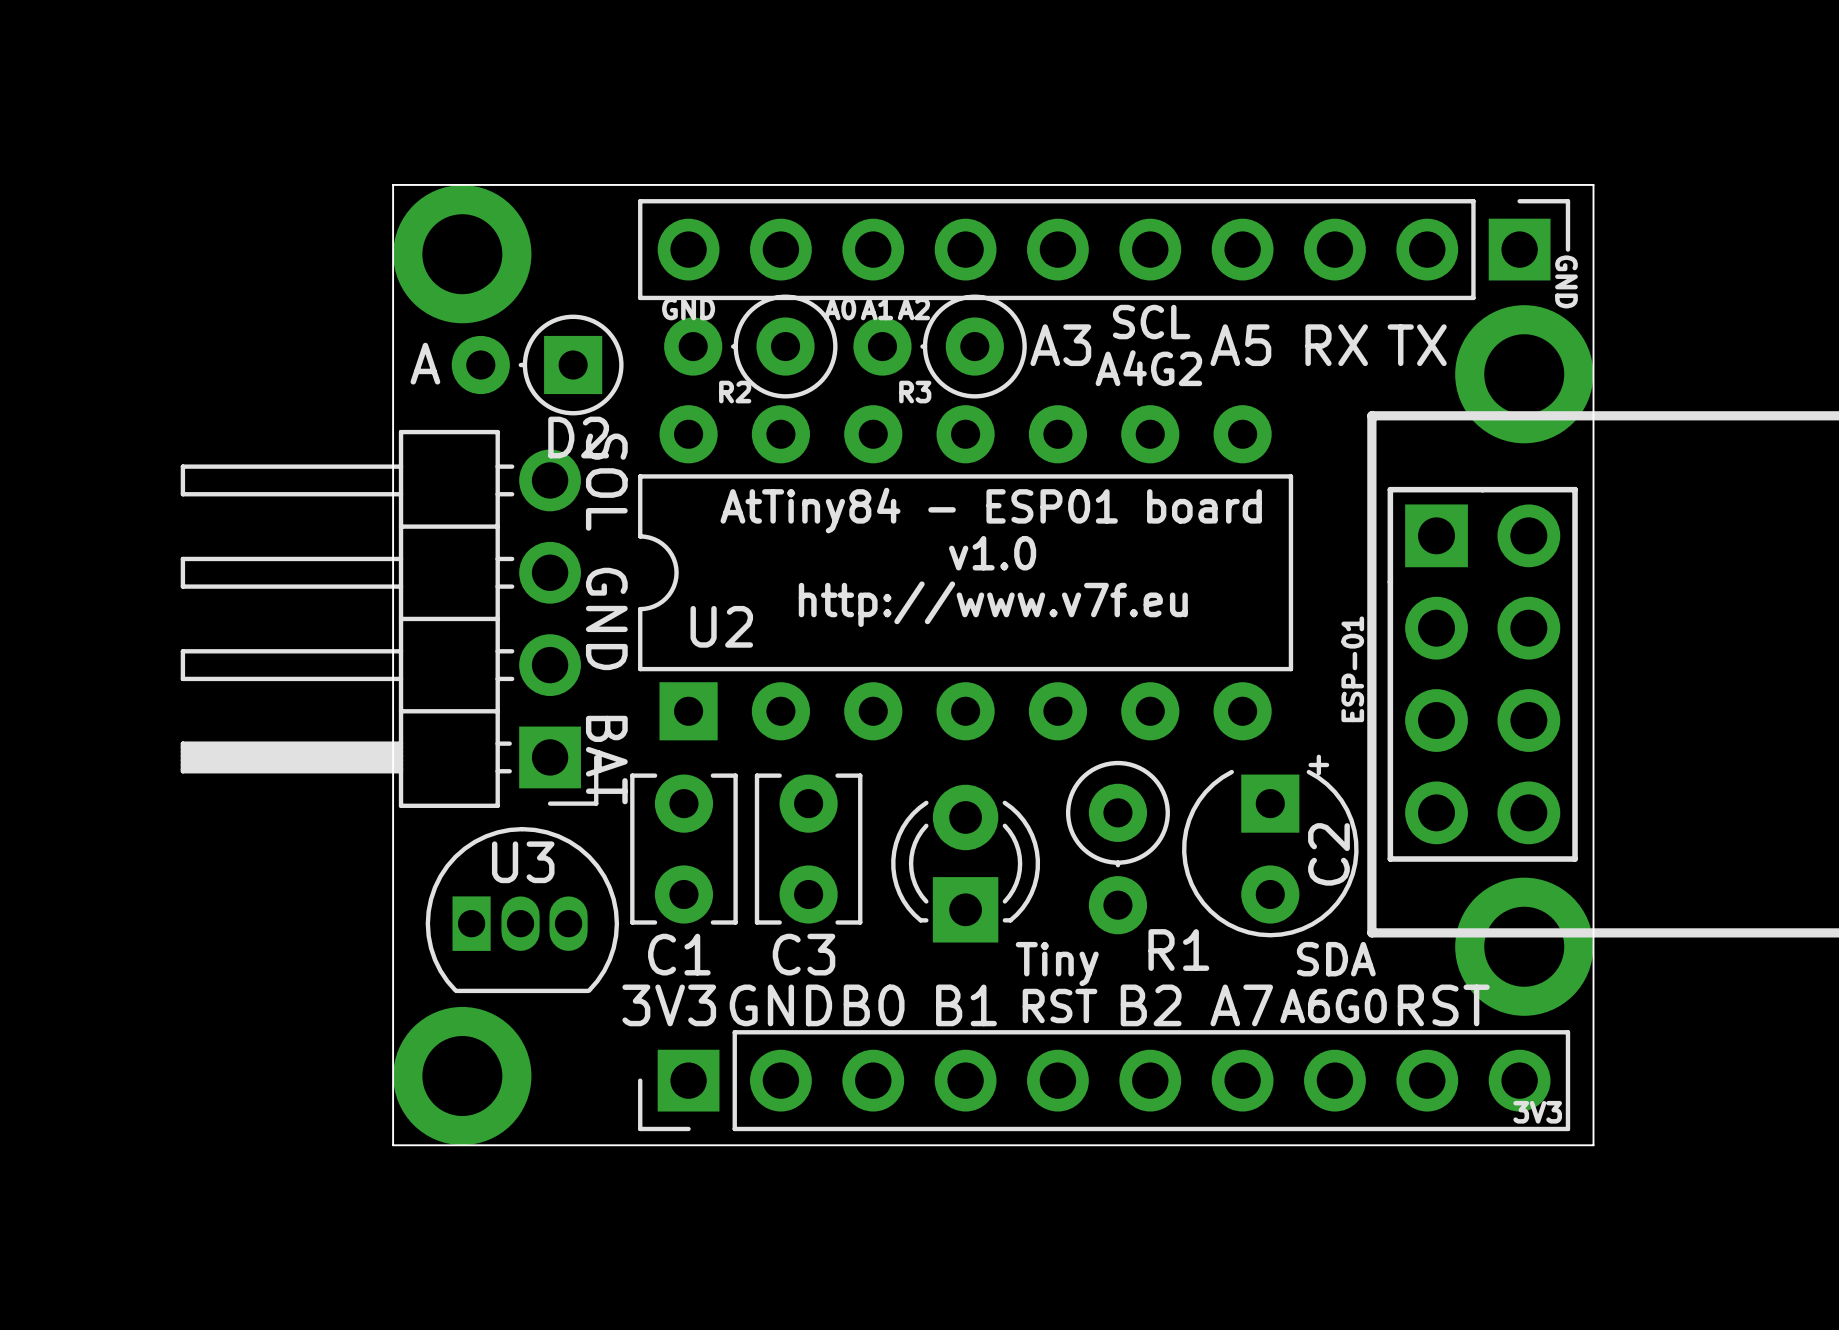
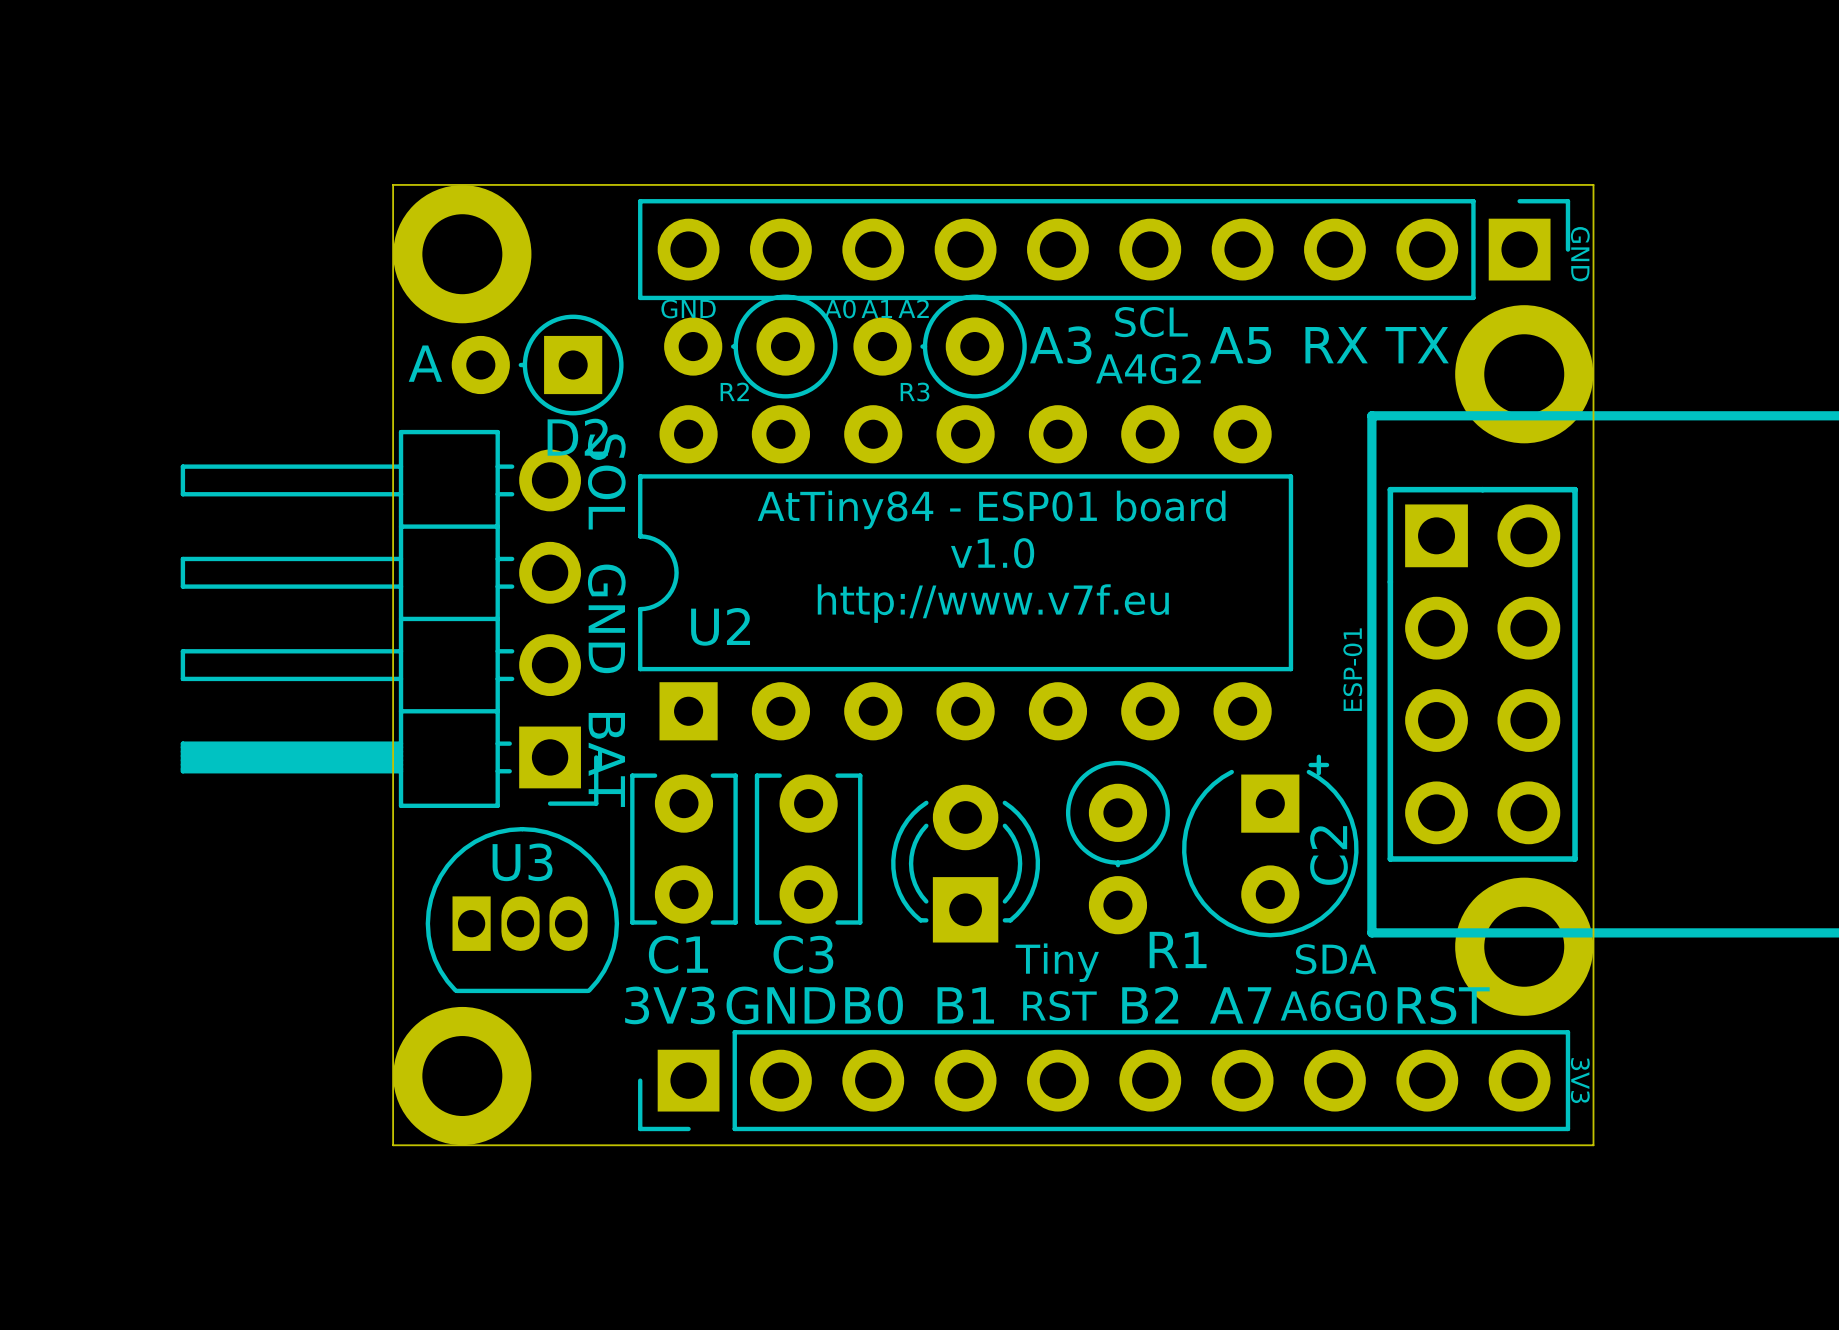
text position: GND (1566, 281) -> GND (1580, 254)
text rotation: 0° (1537, 1112) -> 90° clockwise (1580, 1080)

